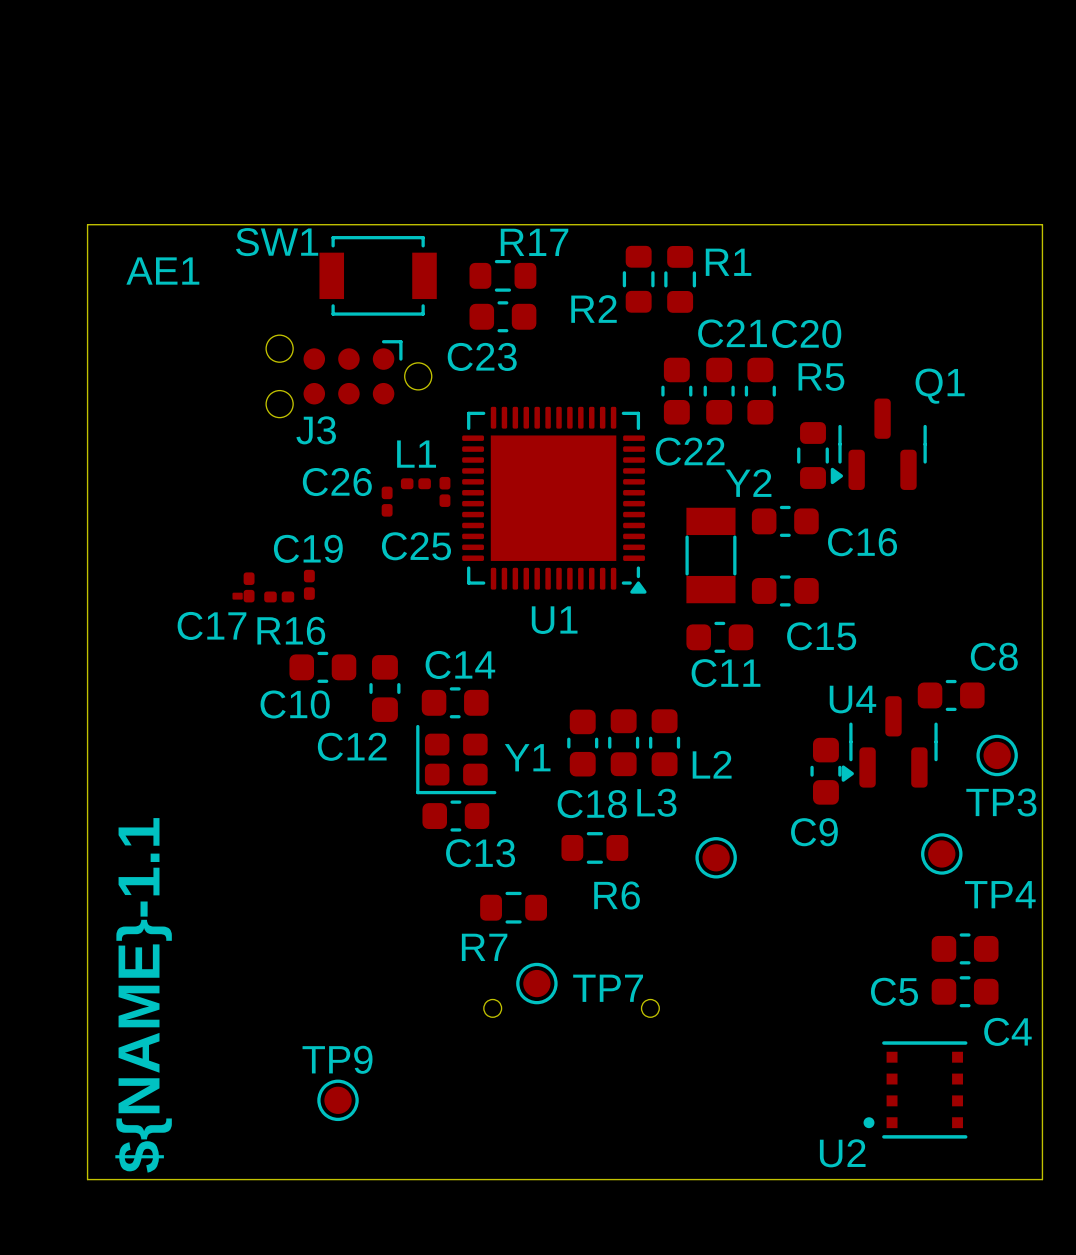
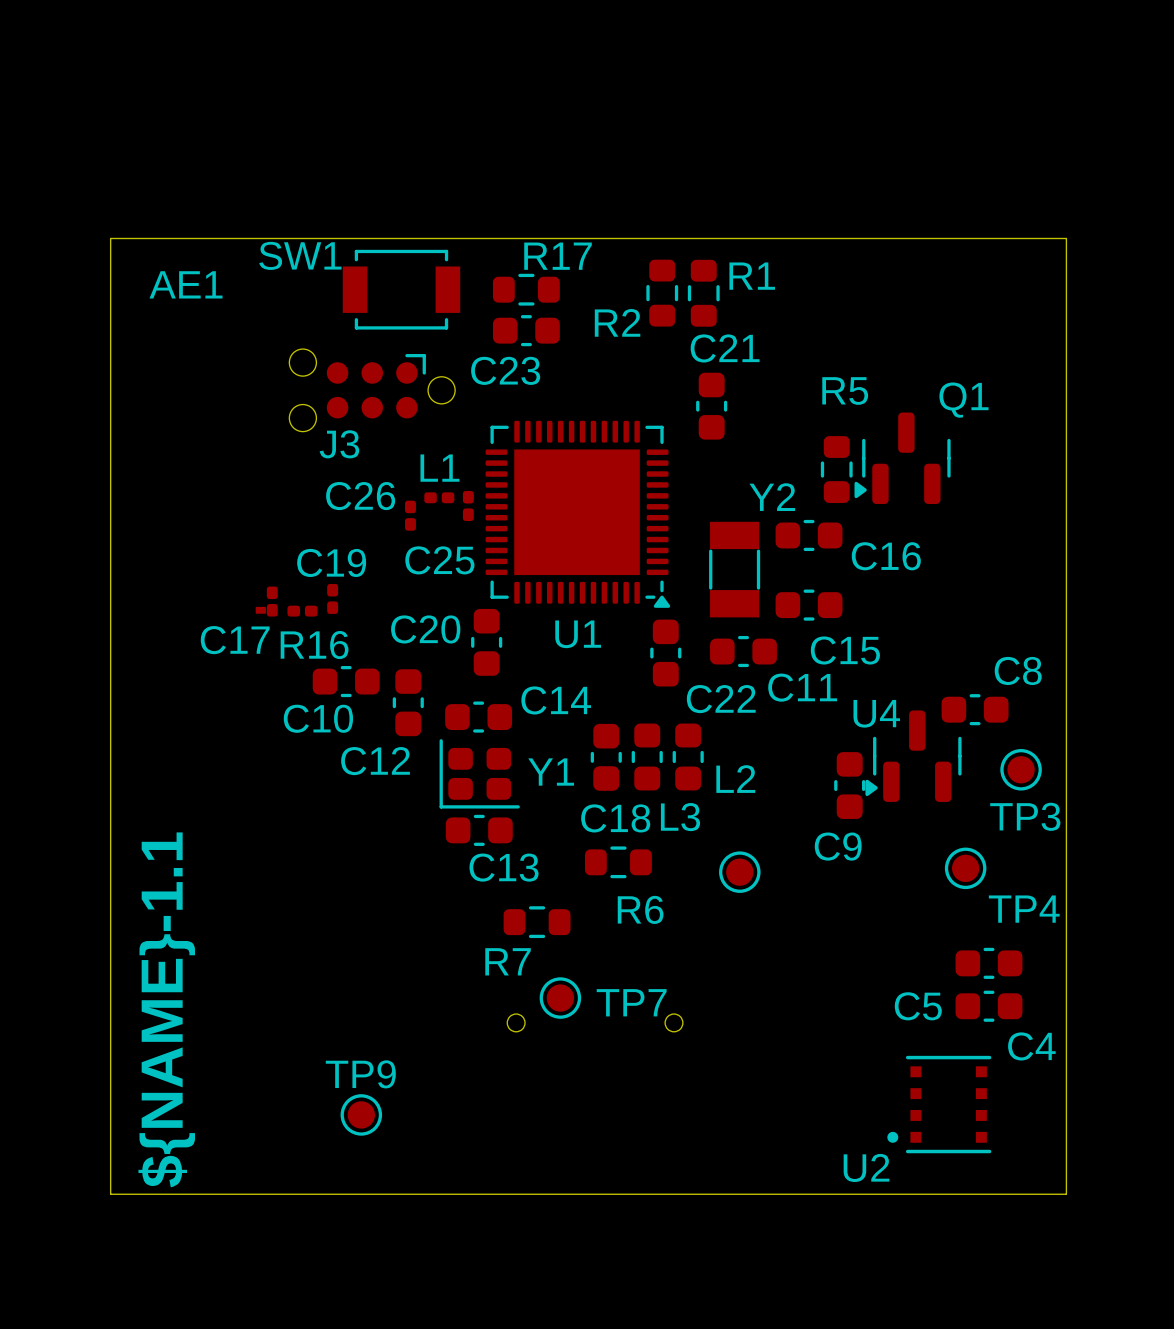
C20 name position: C20 (806, 334) -> C20 (425, 629)
C22 position: (676, 391) -> (665, 653)
C21 position: (719, 391) -> (711, 406)
C20 position: (760, 391) -> (486, 642)
C22 name position: C22 (690, 451) -> C22 (721, 699)
C14 name position: C14 (460, 664) -> C14 (556, 700)
C11 name position: C11 (726, 673) -> C11 (802, 687)

